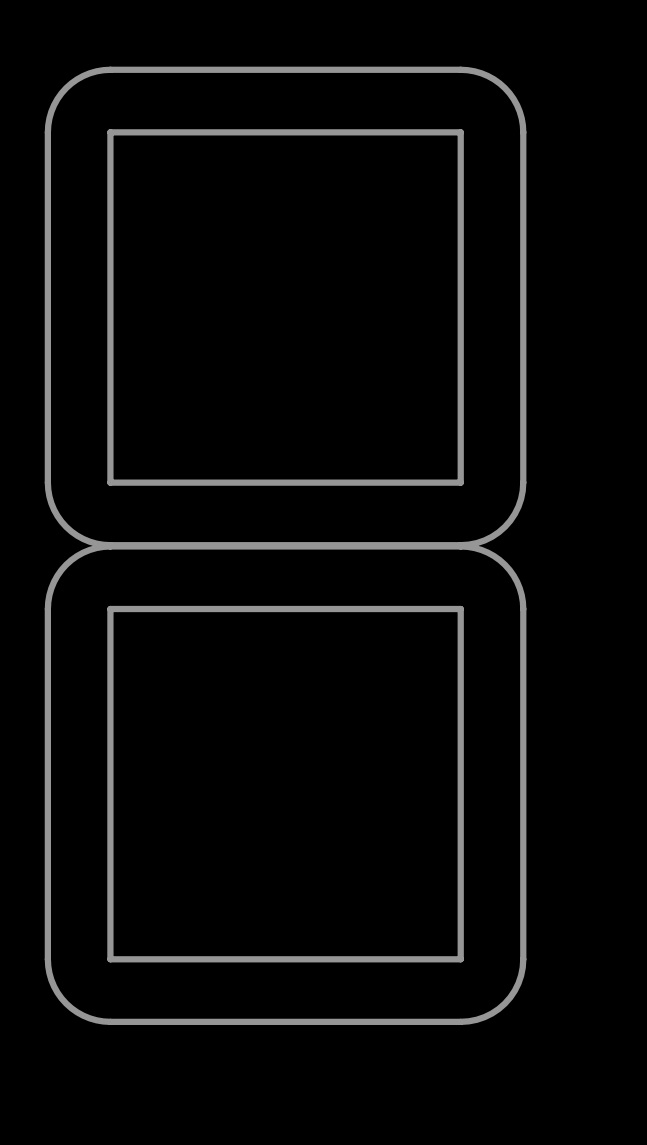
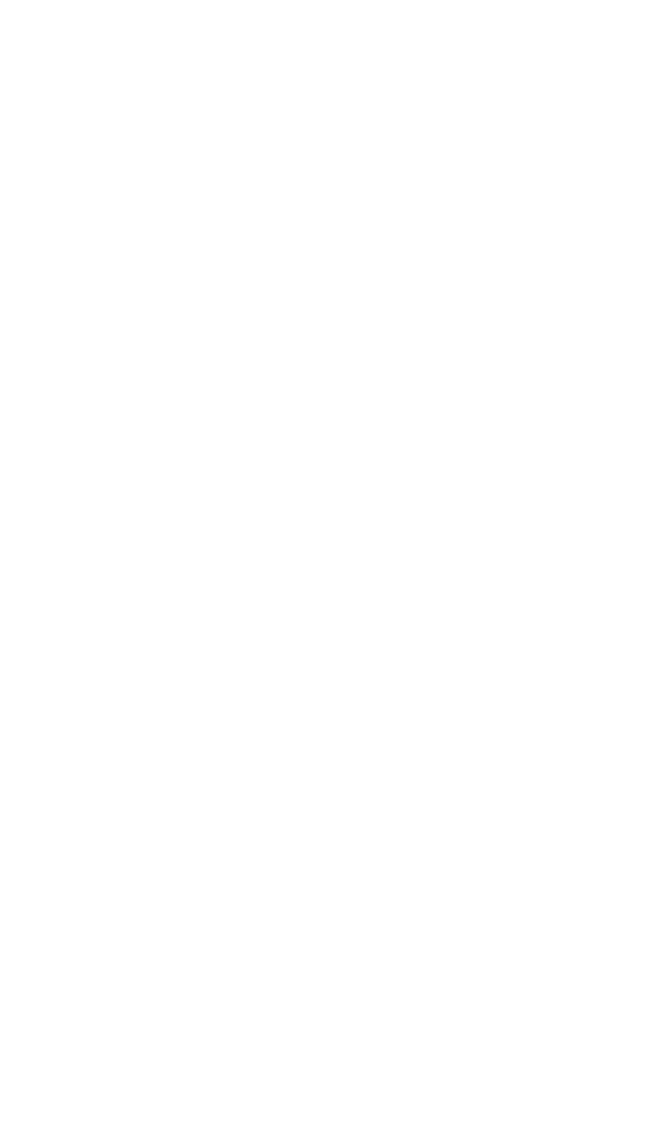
line: (110, 69) (467, 70) (487, 75) (499, 83) (509, 93) (519, 111) (523, 132) (523, 482) (521, 498) (514, 513) (498, 532) (476, 543) (460, 545) (110, 545) (96, 543) (83, 539) (71, 531) (61, 521) (51, 503) (47, 482) (48, 125) (54, 105) (66, 88) (83, 75) (96, 71) (110, 69) -> none
line: (110, 132) (110, 482) (460, 482) (460, 132) (110, 132) -> none
line: (110, 546) (467, 546) (487, 552) (499, 560) (509, 570) (519, 588) (523, 609) (523, 959) (518, 983) (510, 997) (498, 1008) (476, 1019) (460, 1021) (110, 1021) (96, 1020) (83, 1015) (71, 1008) (61, 998) (51, 979) (47, 959) (48, 602) (51, 588) (57, 575) (71, 560) (89, 549) (110, 546) -> none
line: (110, 609) (110, 959) (460, 959) (460, 609) (110, 609) -> none

